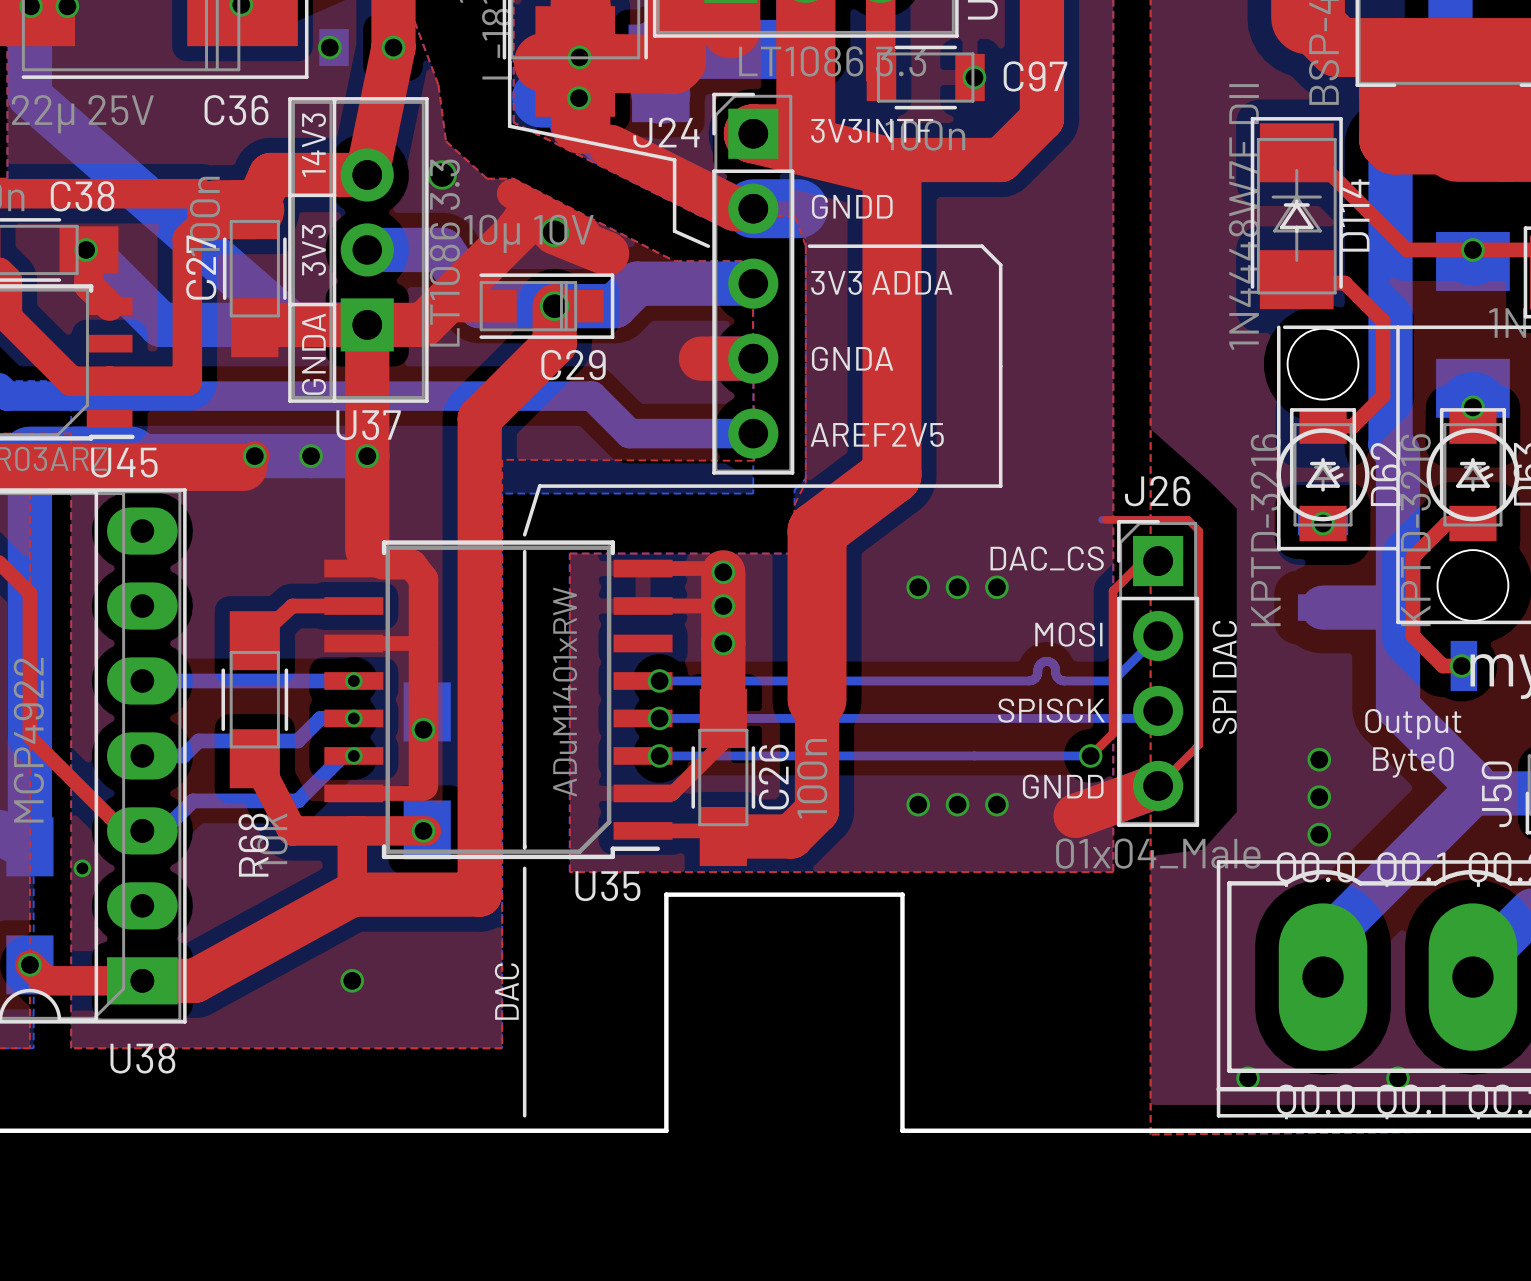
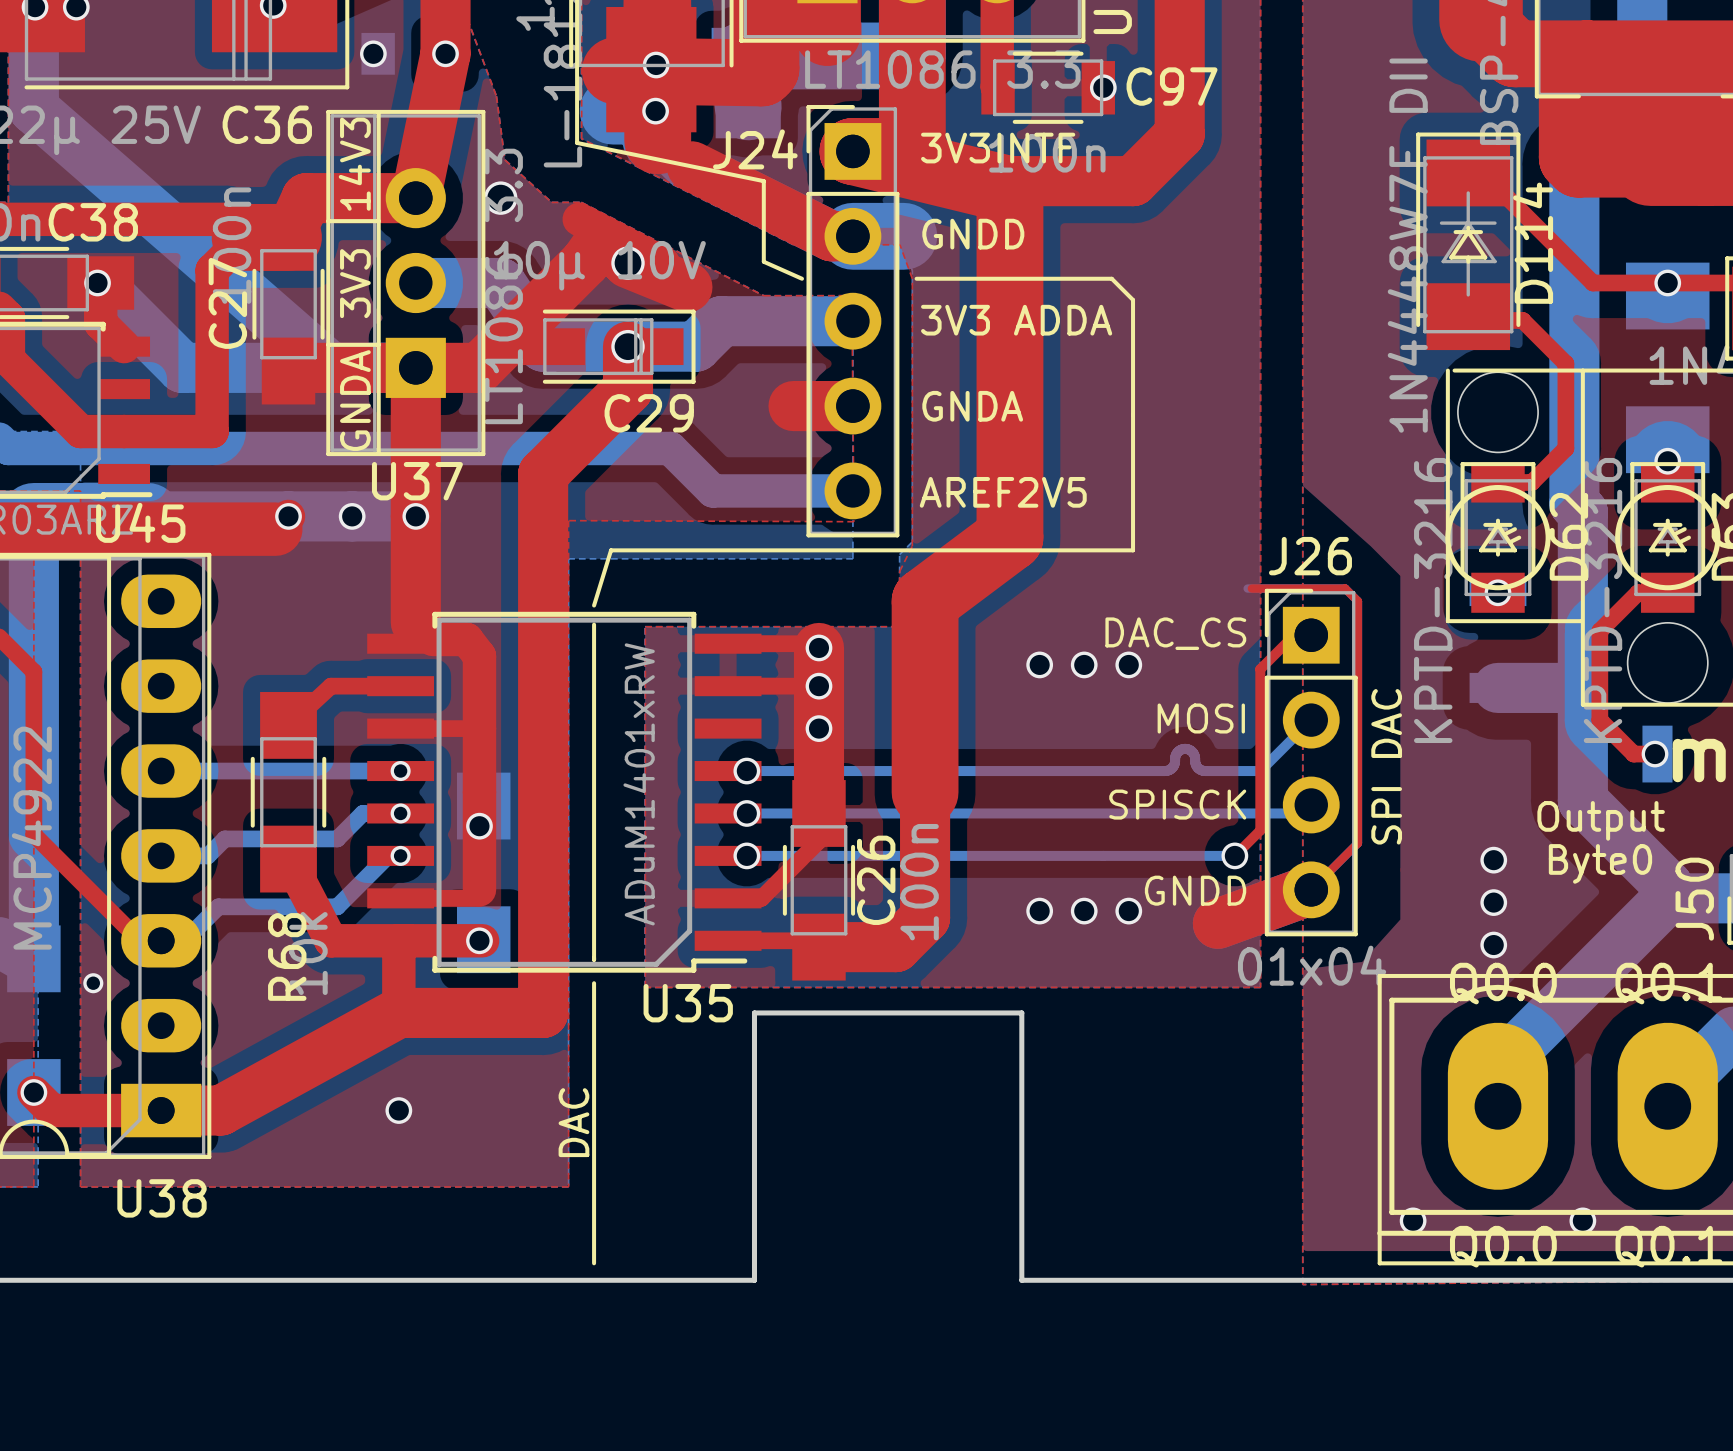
J26 value: 01x04_Male (1158, 853) -> 01x04 (1312, 965)

